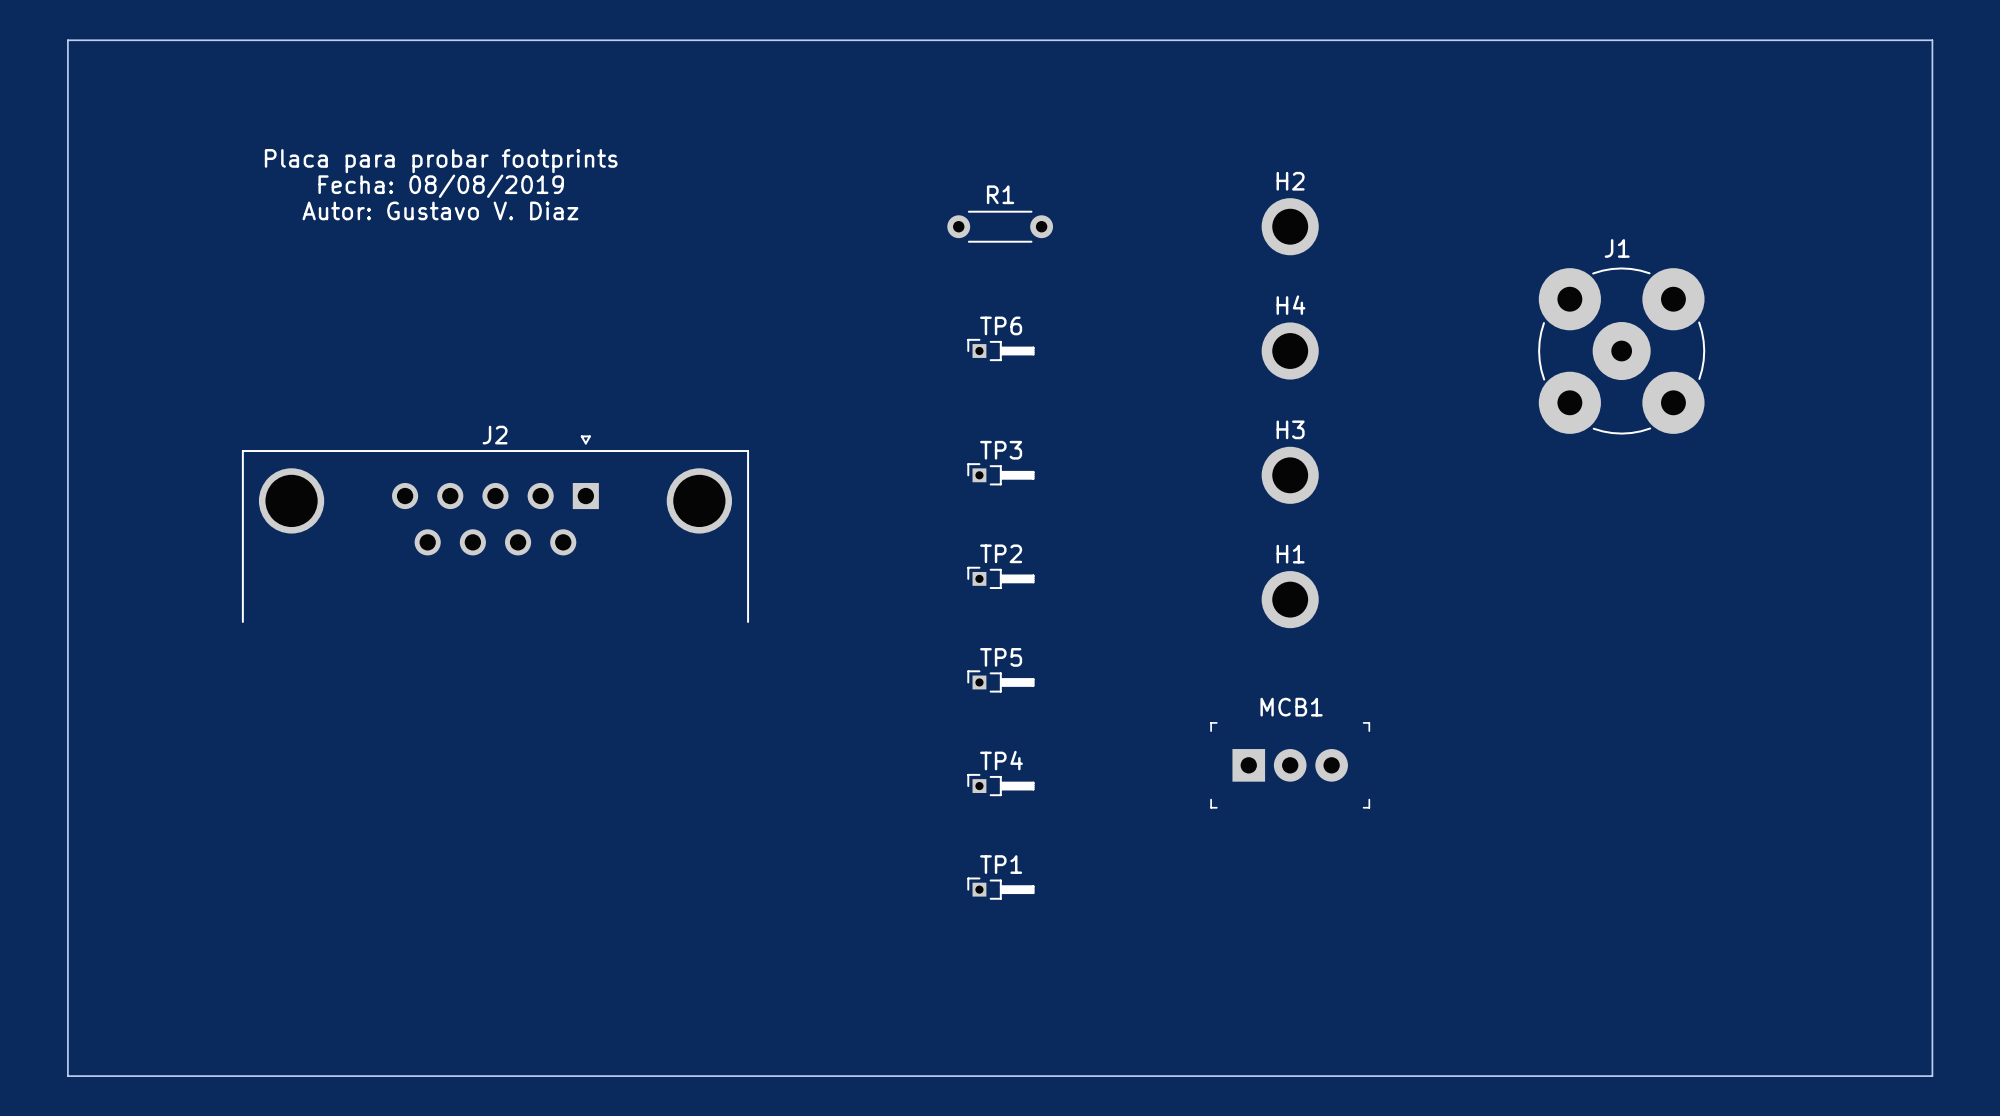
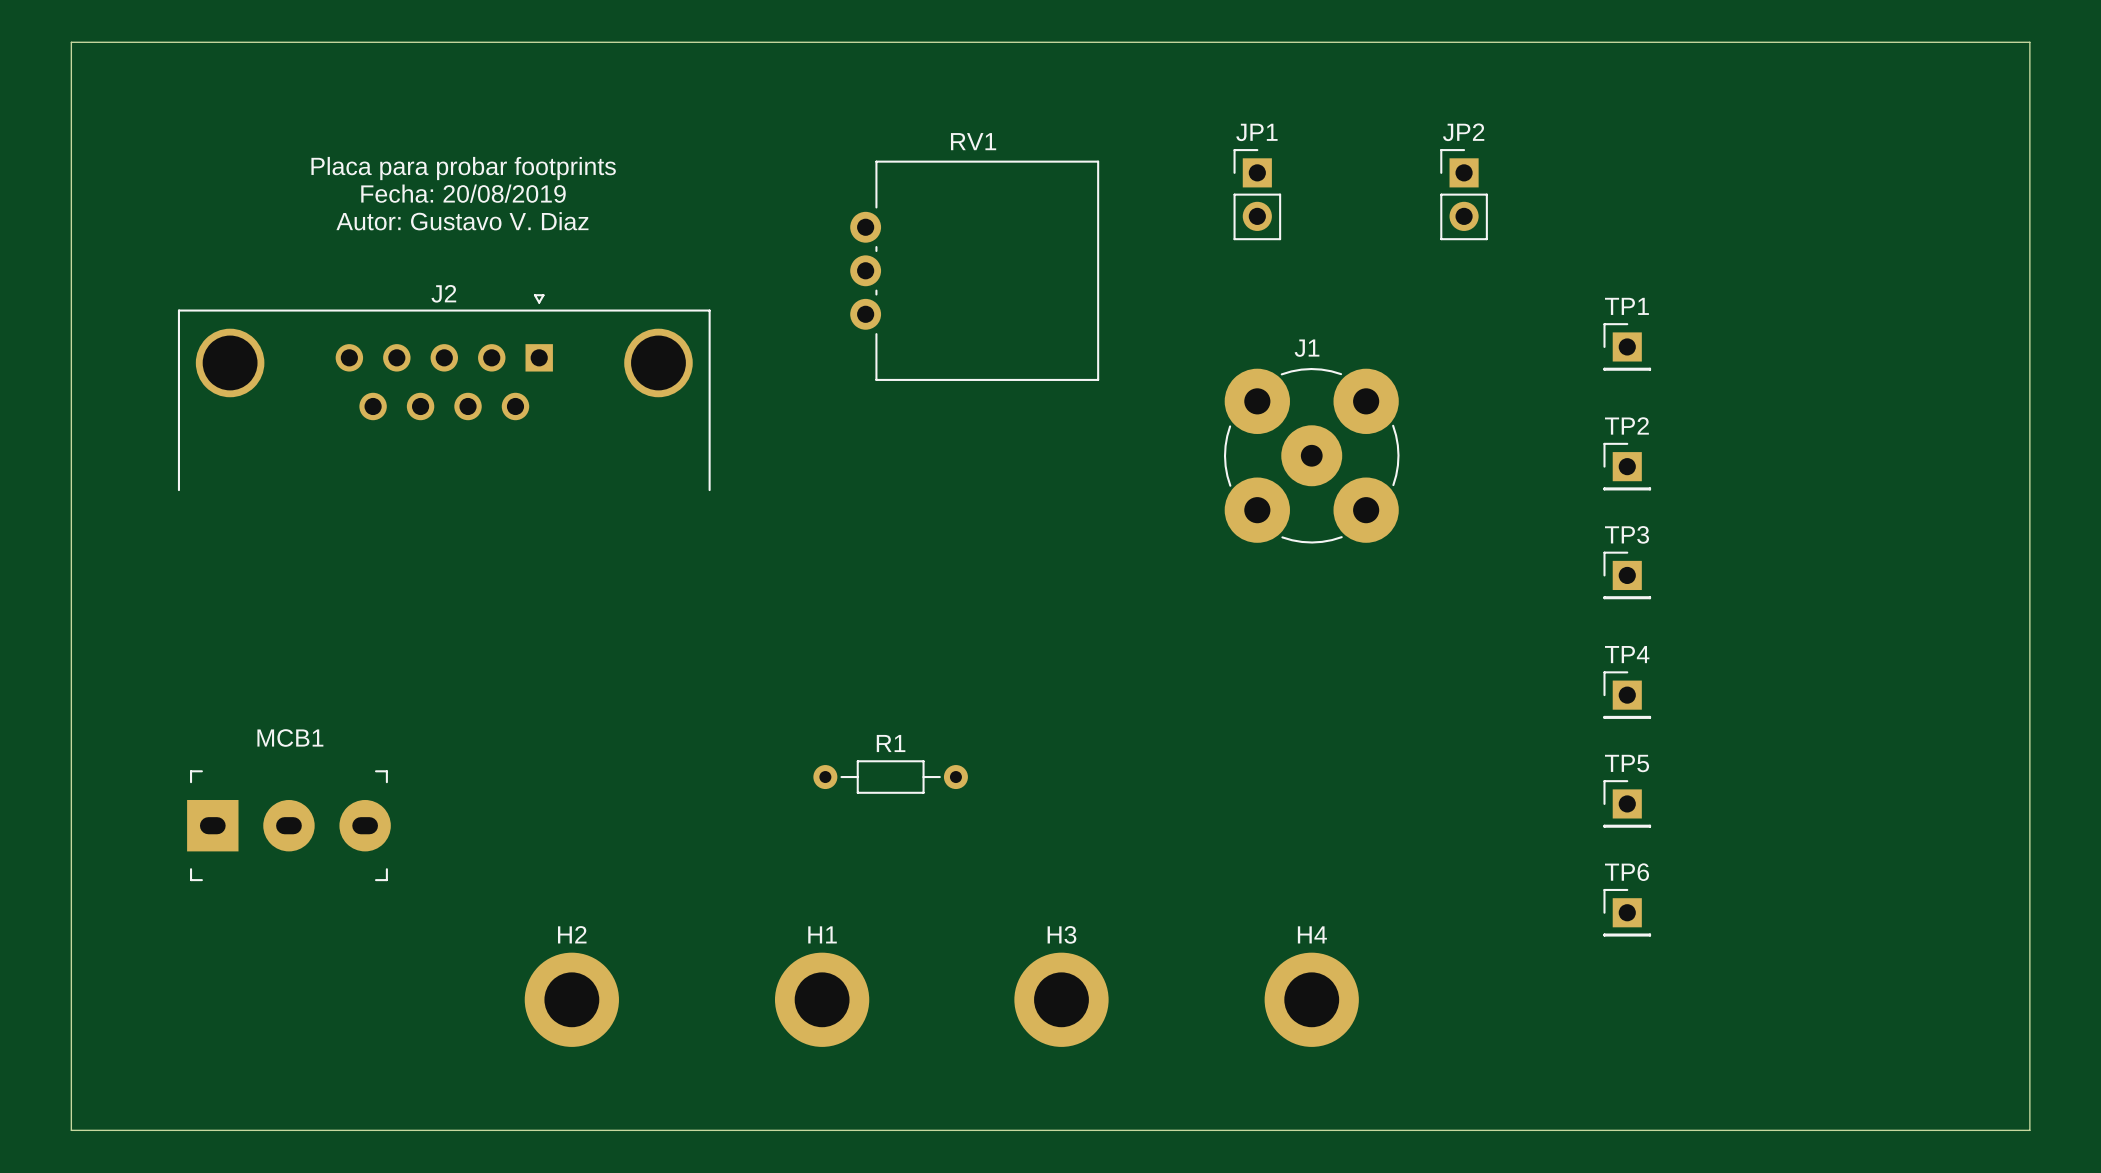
JP1: none -> (1257, 194)
JP2: none -> (1464, 194)
text: Fecha: 08/08/2019 (441, 186) -> Fecha: 20/08/2019 (463, 193)
H2 footprint: [1261, 198, 1319, 256] -> [524, 952, 619, 1047]
R1 footprint: [947, 210, 1054, 243] -> [813, 760, 968, 794]
RV1: none -> (974, 270)
H4 footprint: [1261, 322, 1319, 380] -> [1264, 952, 1359, 1047]
TP6 footprint: [967, 338, 1035, 362] -> [1603, 888, 1652, 937]
J1 position: (1621, 351) -> (1311, 455)
H3 footprint: [1261, 446, 1319, 504] -> [1014, 952, 1109, 1047]
TP3 footprint: [967, 463, 1035, 486] -> [1603, 551, 1652, 600]
J2 position: (495, 529) -> (444, 392)
TP2 footprint: [967, 566, 1035, 590] -> [1603, 442, 1652, 491]
H1 footprint: [1261, 571, 1319, 629] -> [774, 952, 870, 1047]
TP5 footprint: [967, 670, 1035, 693] -> [1603, 780, 1652, 828]
MCB1 footprint: [1210, 722, 1371, 809] -> [187, 770, 391, 882]
TP4 footprint: [967, 773, 1035, 797] -> [1603, 671, 1652, 719]
TP1 footprint: [967, 877, 1035, 900] -> [1603, 323, 1652, 371]

